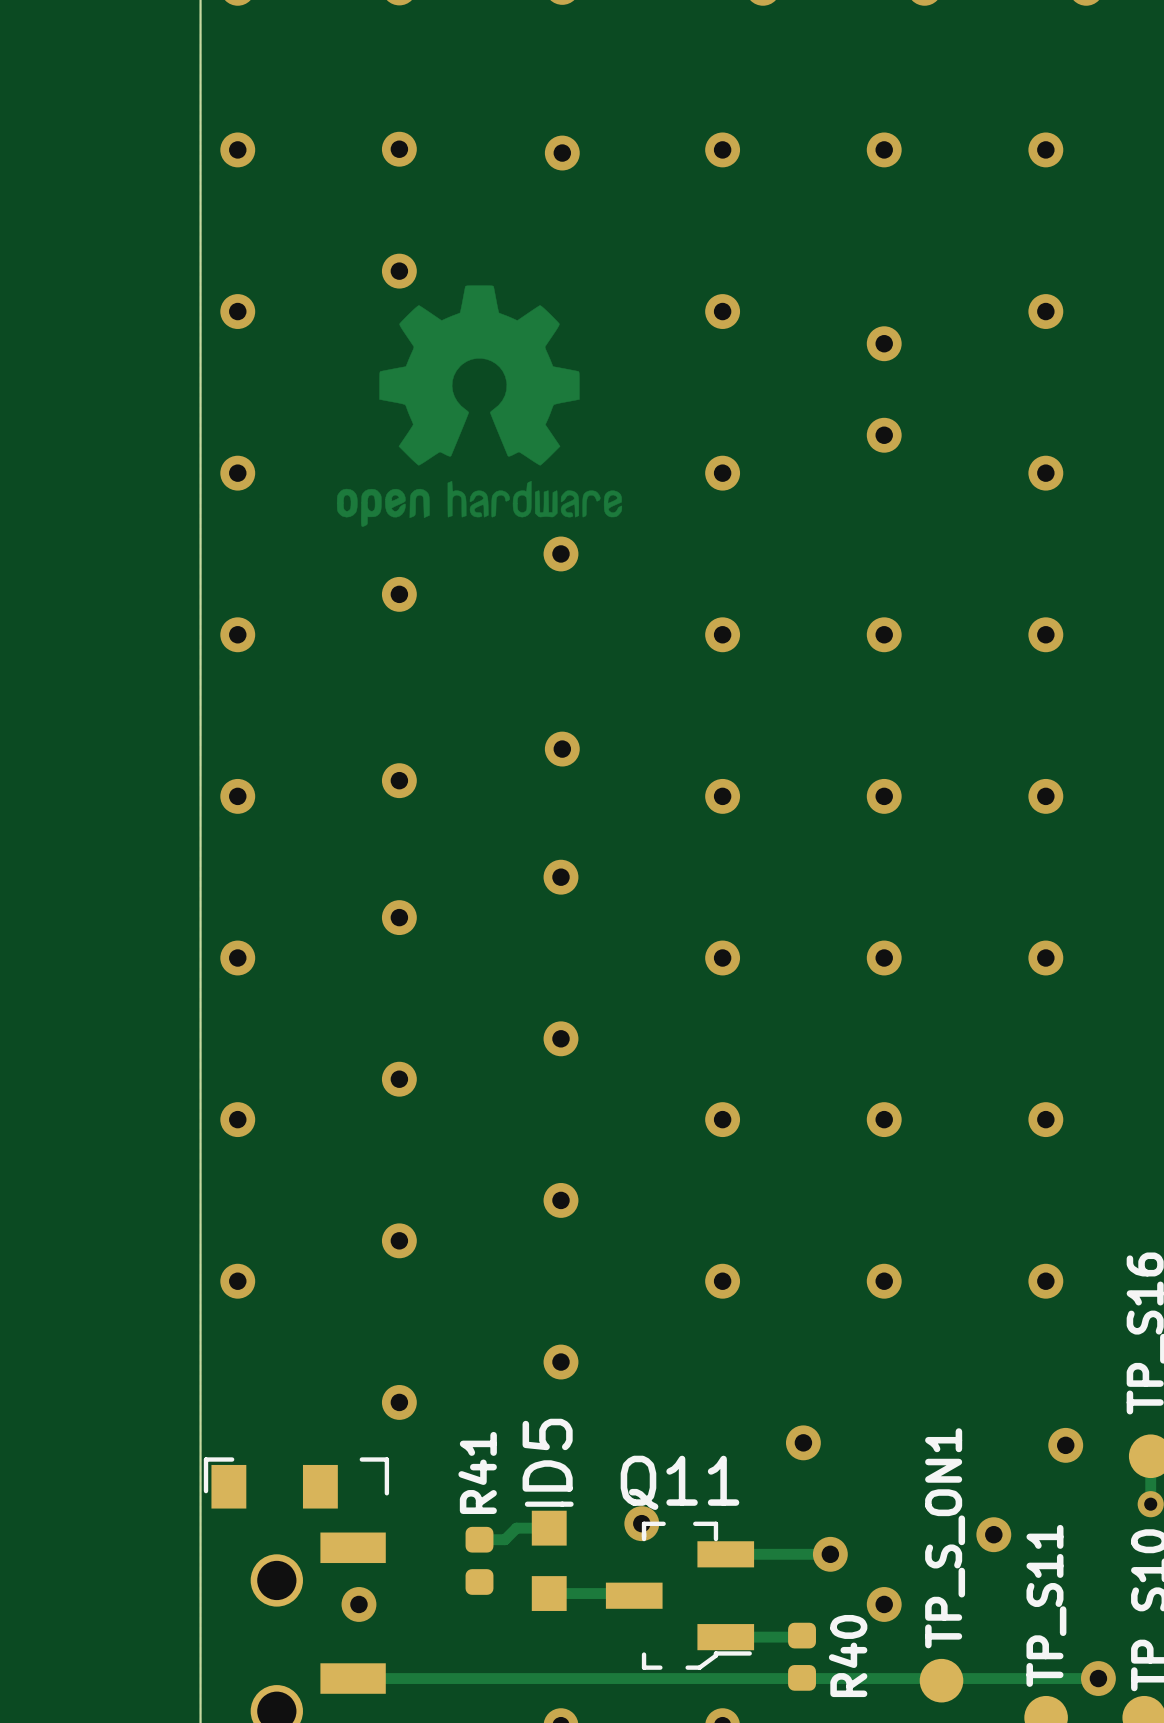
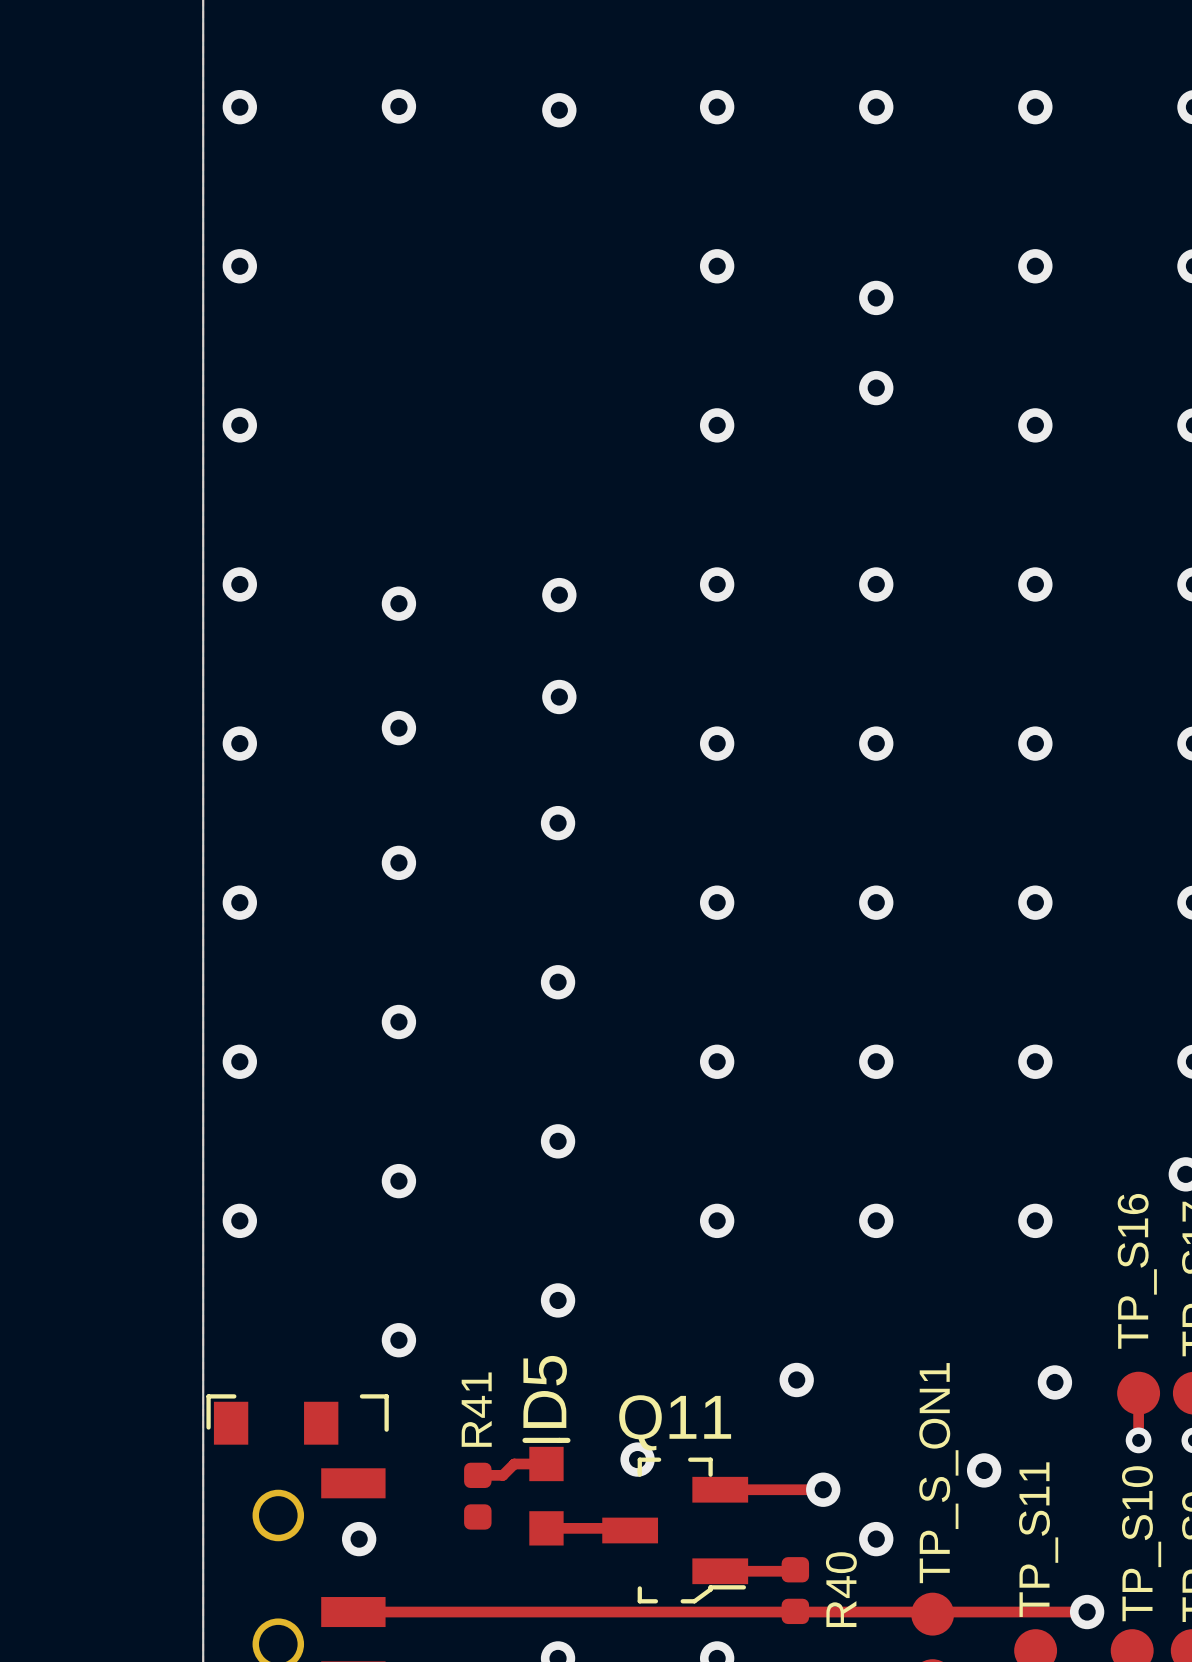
via: (399, 271) -> none
drawing: [336, 285, 623, 527] -> none
via: (560, 553) -> none
via position: (399, 594) -> (398, 603)
via: none -> (559, 595)

